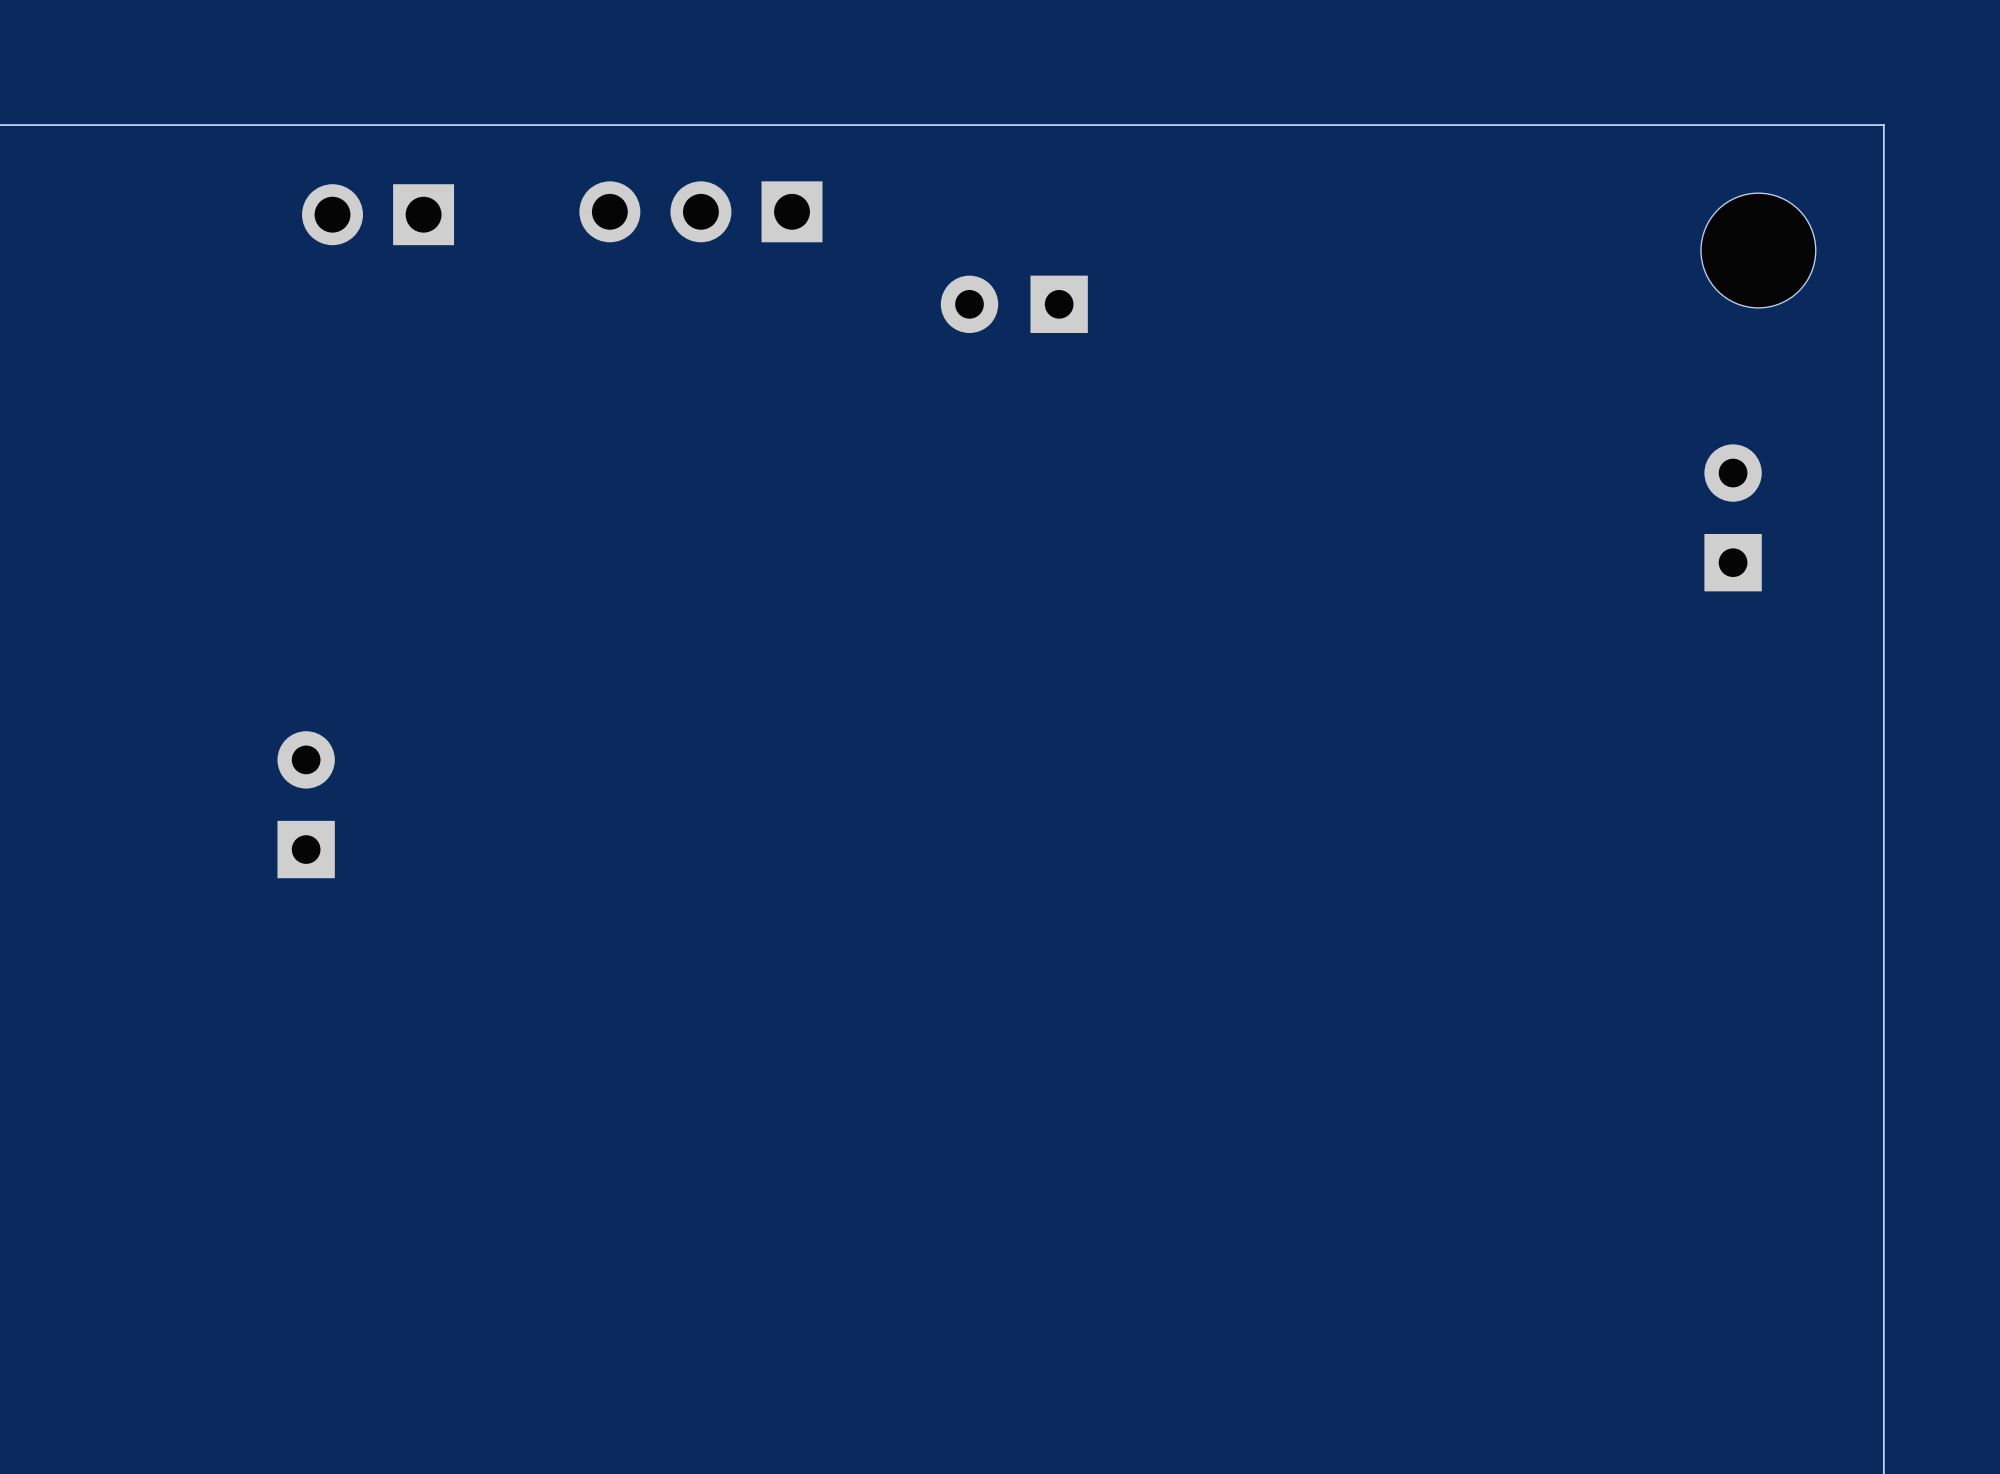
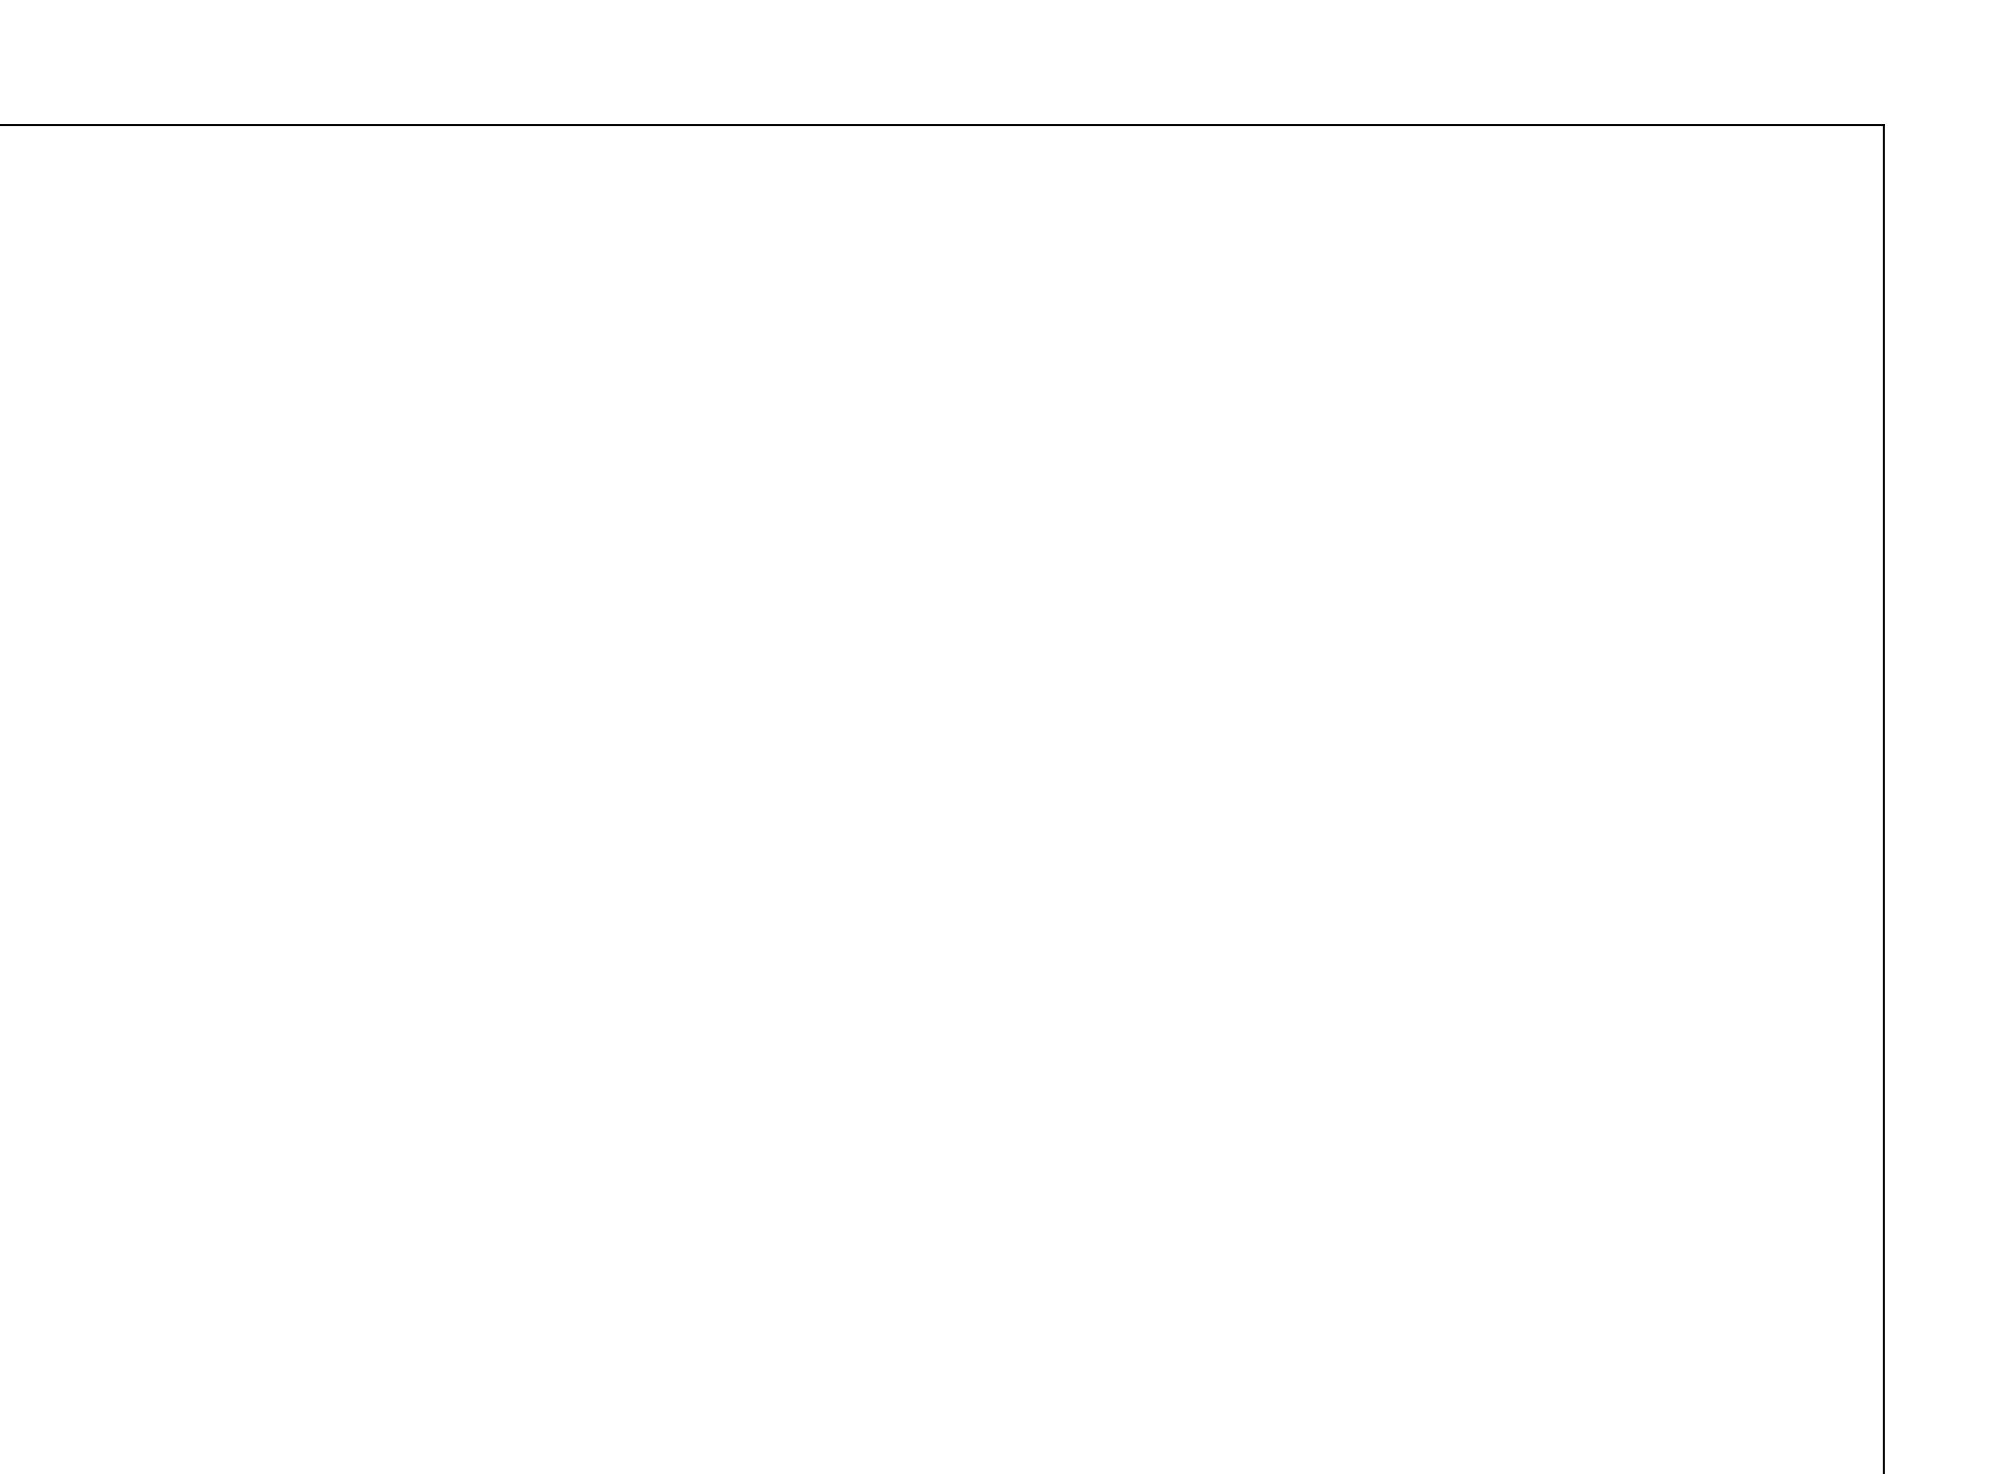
part: (700, 211) -> none
part: (378, 214) -> none
part: (1758, 250) -> none
part: (1014, 304) -> none
part: (1733, 517) -> none
part: (306, 804) -> none

